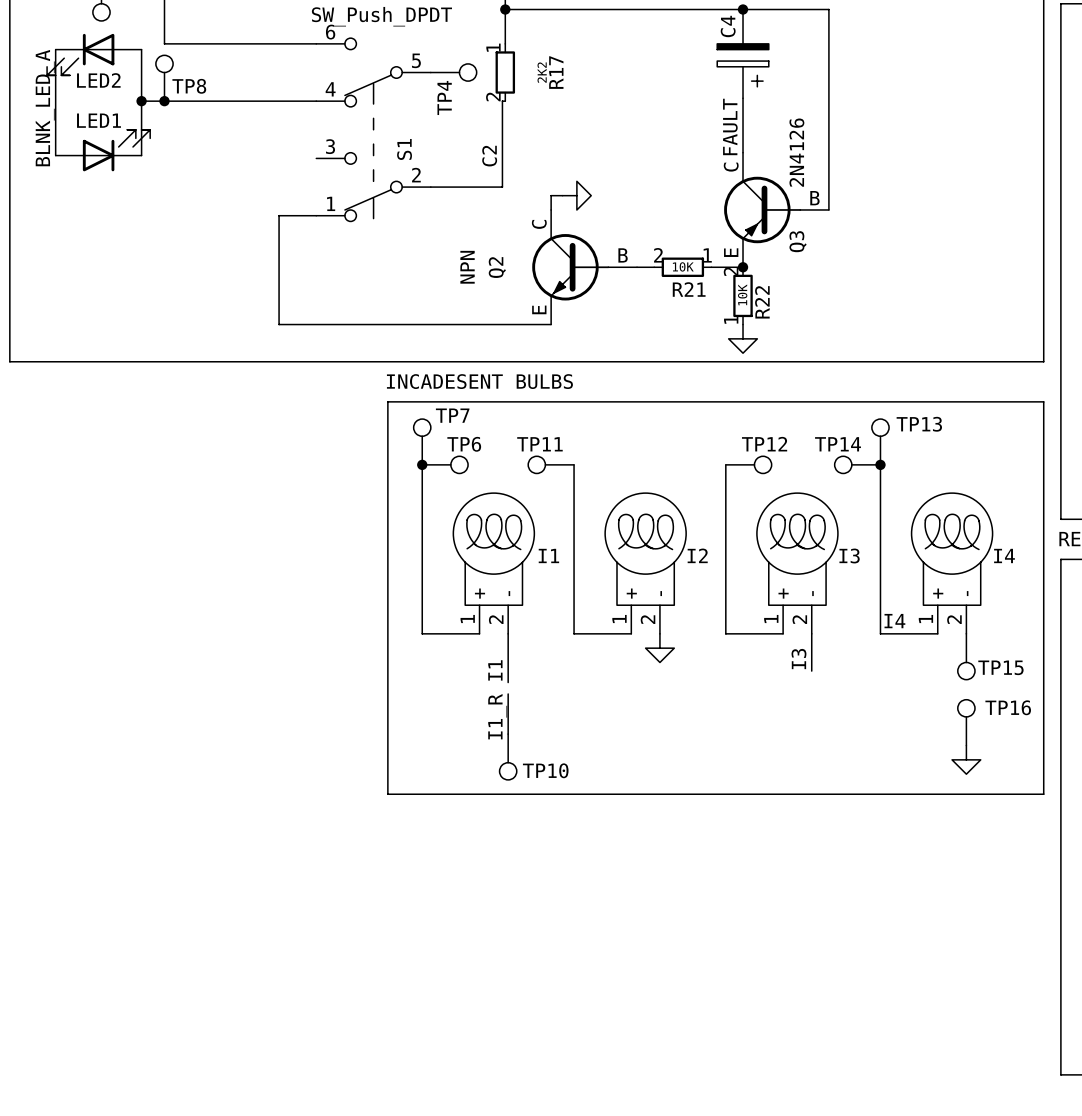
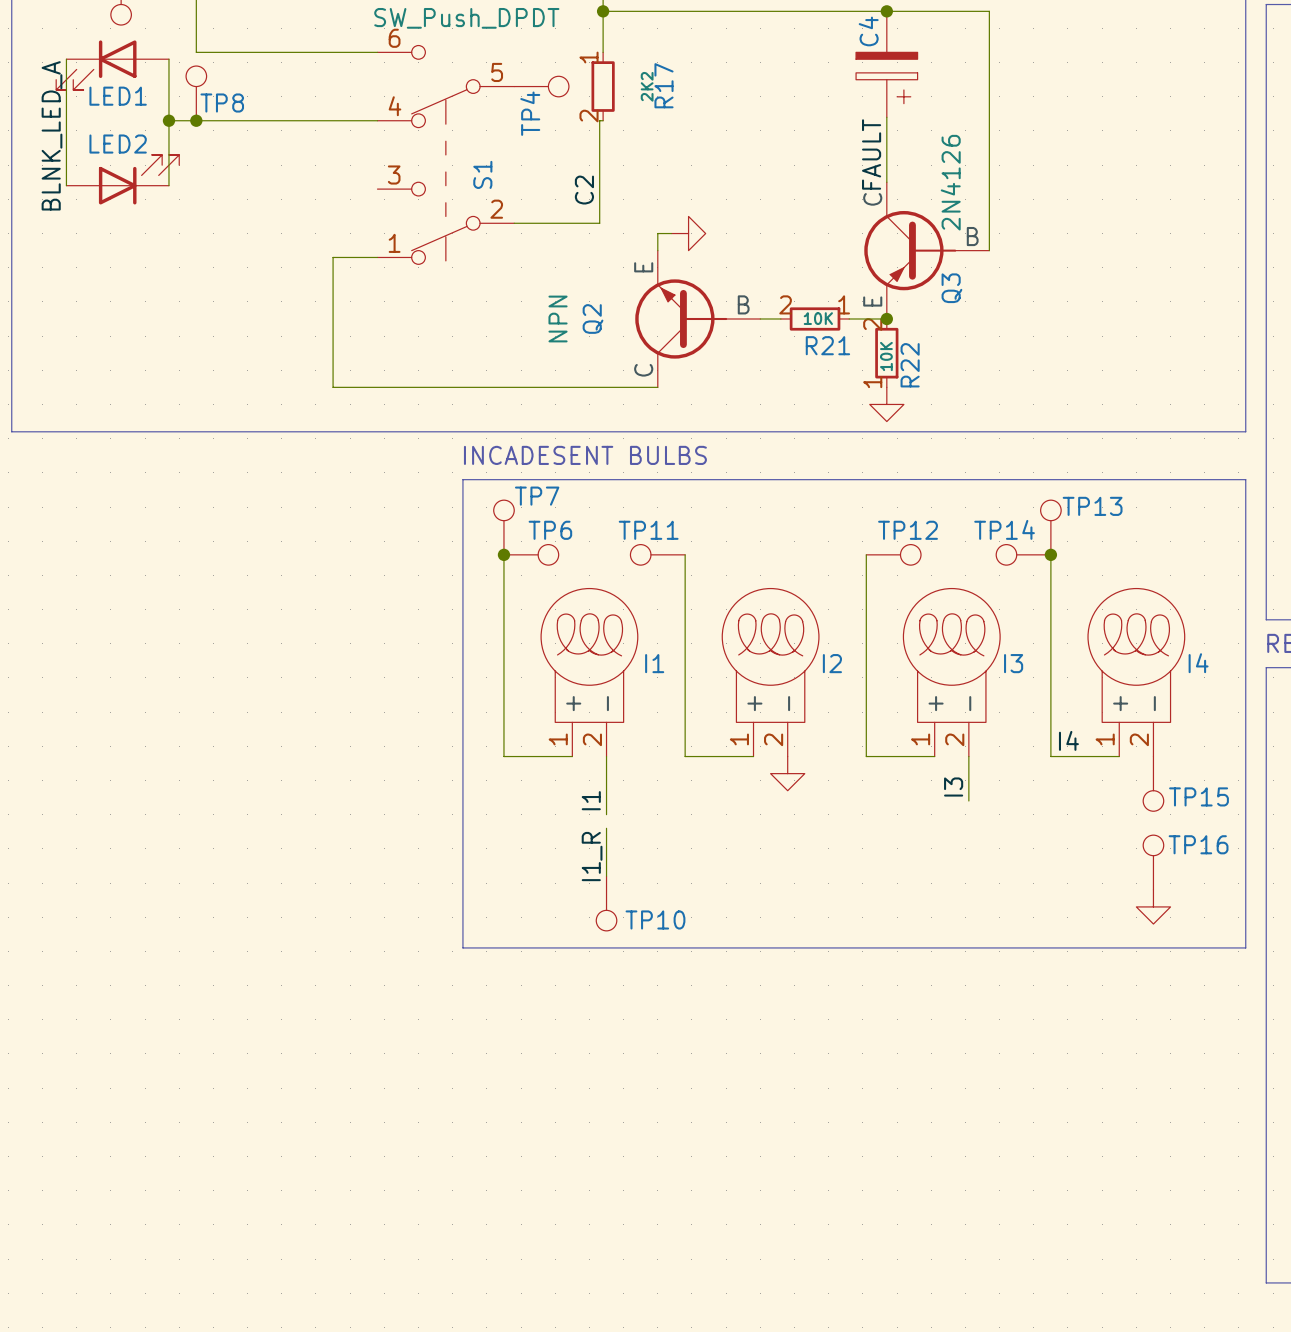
LED2 name: LED2 (98, 80) -> LED1 (118, 96)
LED1 name: LED1 (98, 120) -> LED2 (118, 144)
Q2 flip: as is (570, 267) -> up-down (681, 318)

